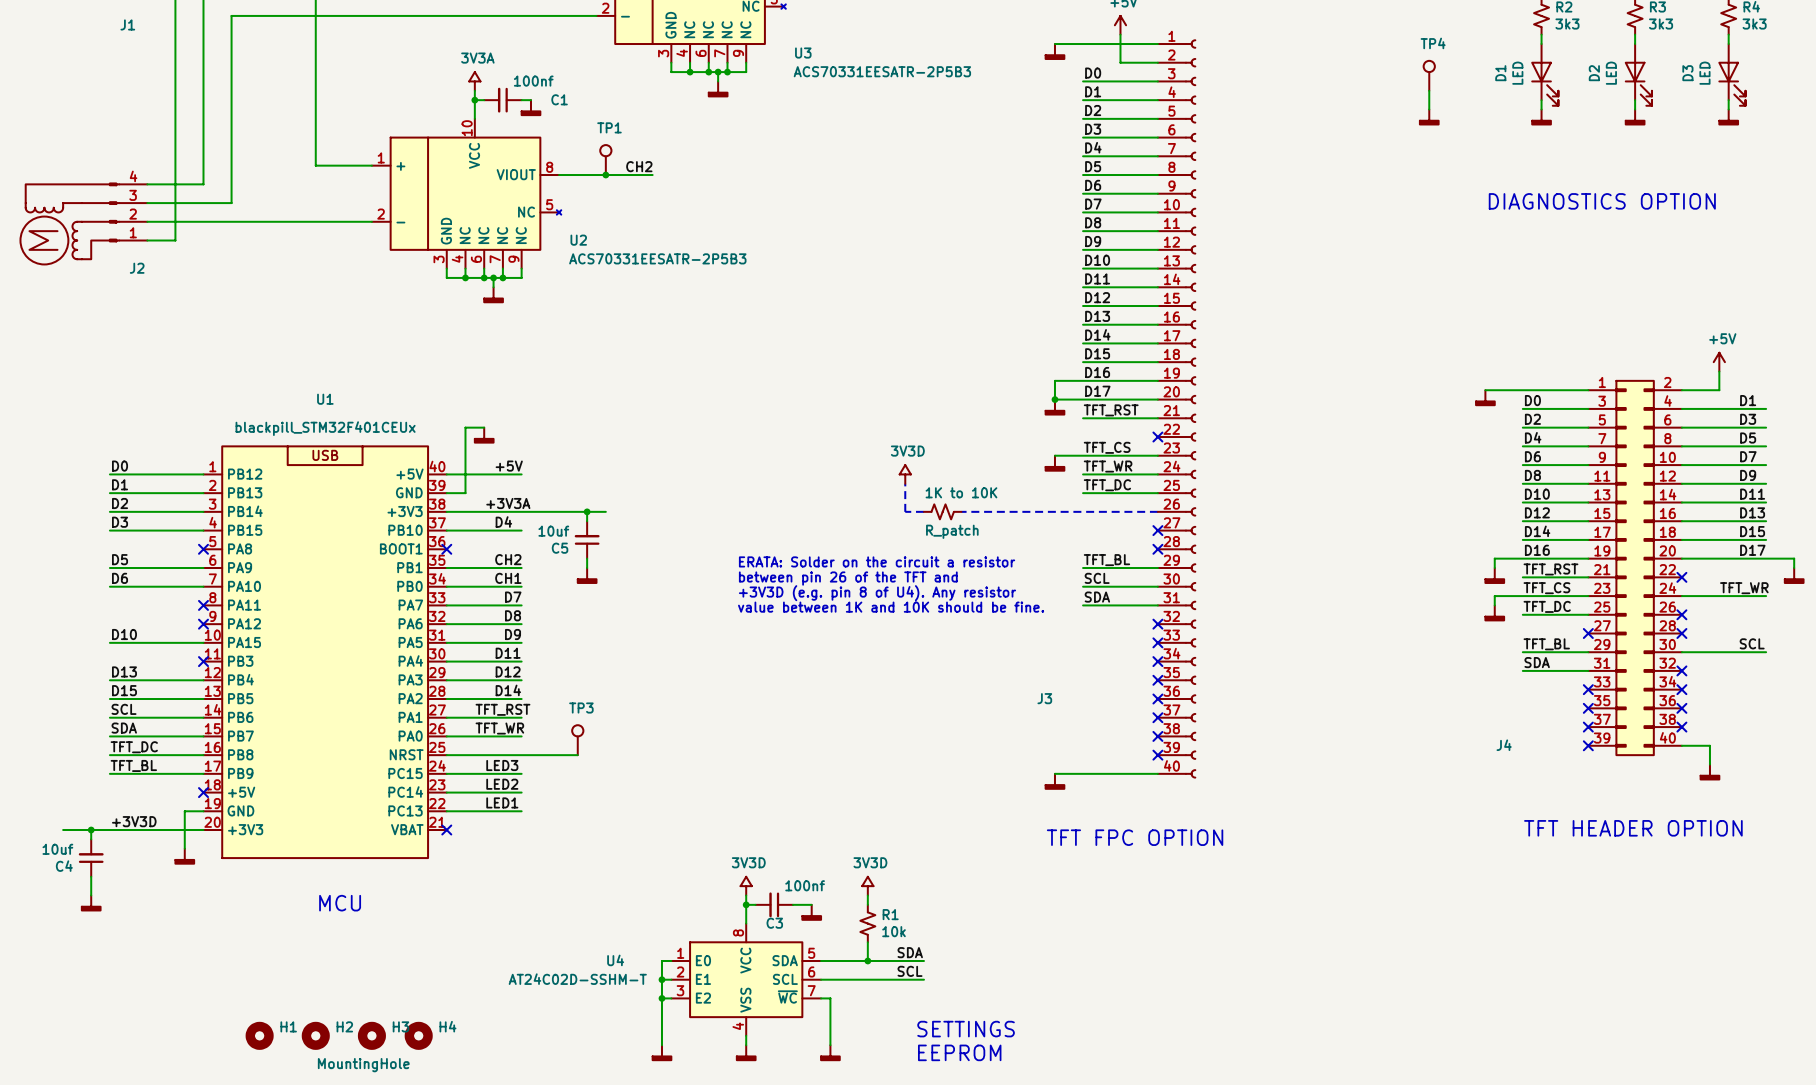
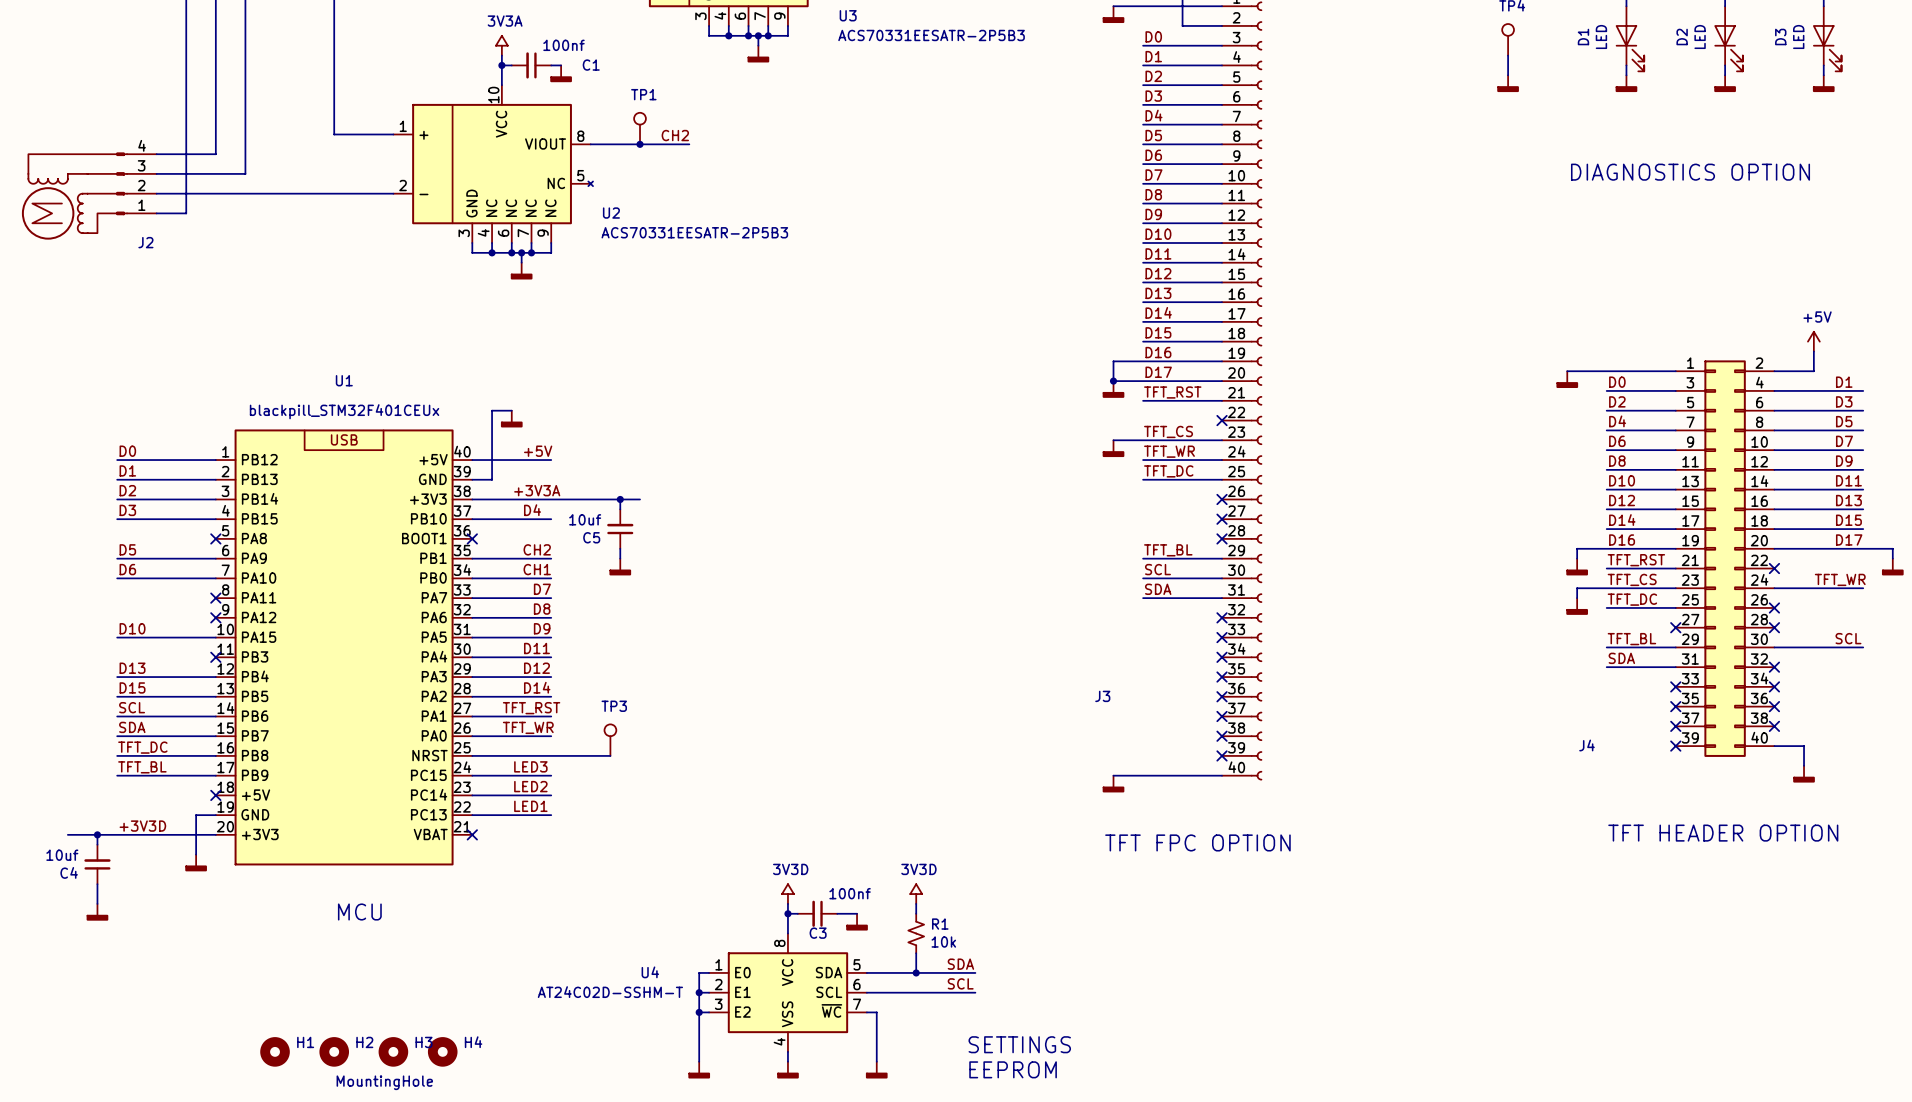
power symbol: 3V3D (905, 474) -> none
line: (905, 483) (905, 511) (923, 511) -> none
R_patch: 1K to 10K (942, 511) -> none
line: (961, 511) (1157, 511) -> none
no-connect mark: none -> (1222, 499)
text: ERATA: Solder on the circuit a resistor (877, 561) -> none
text: between pin 26 of the TFT and (848, 578) -> none
text: +3V3D (e.g. pin 8 of U4). Any resistor (877, 593) -> none
text: value between 1K and 10K should be fine. (891, 607) -> none

